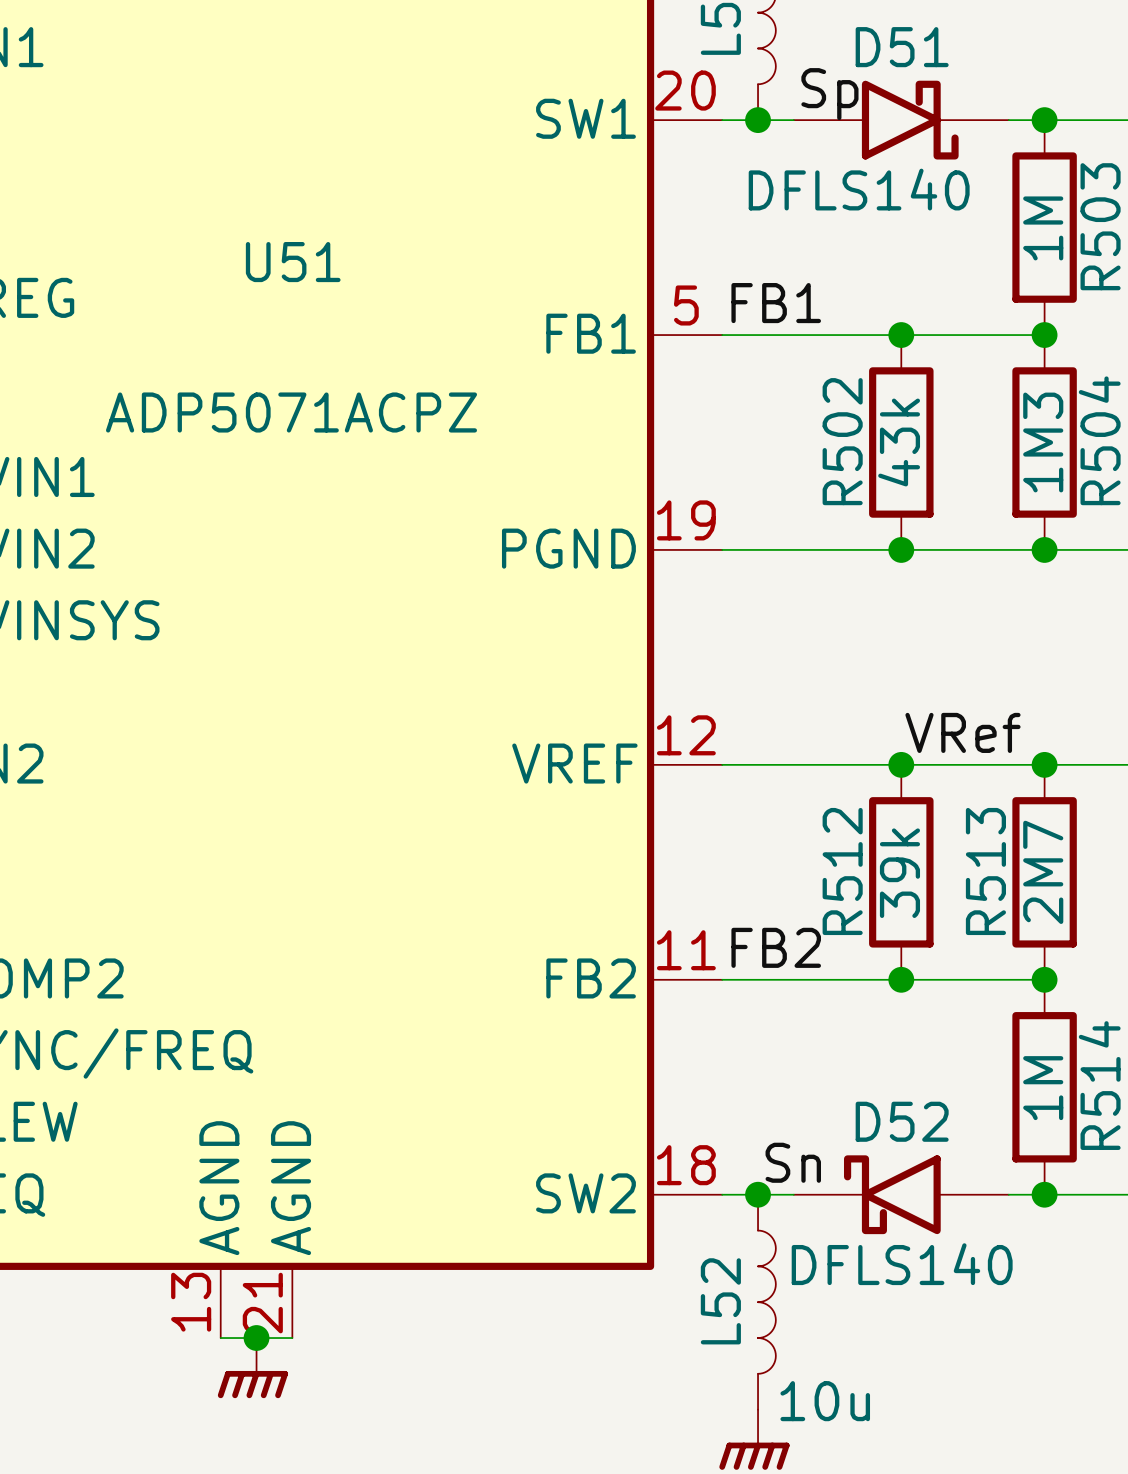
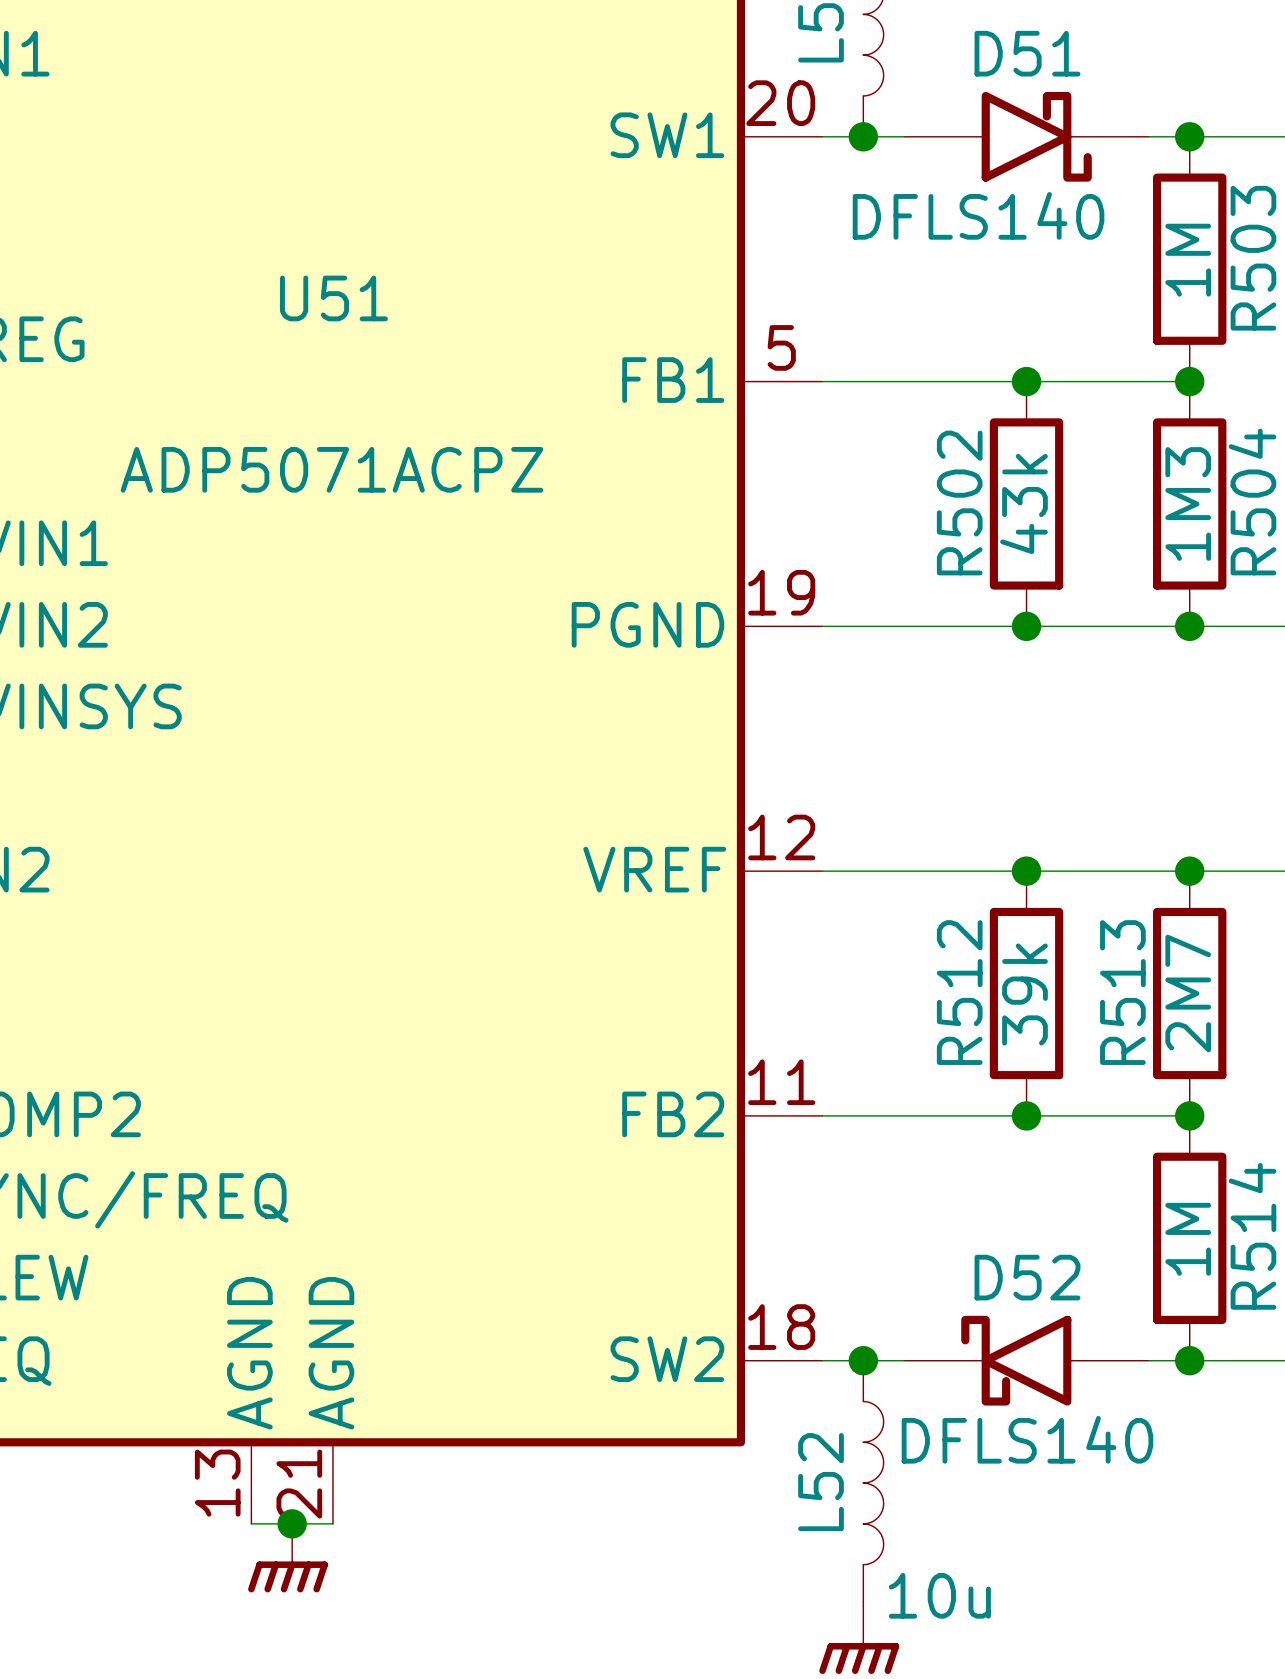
label: Sp (829, 94) -> none
label: FB1 (776, 303) -> none
label: VRef (962, 732) -> none
label: FB2 (776, 947) -> none
label: Sn (793, 1162) -> none

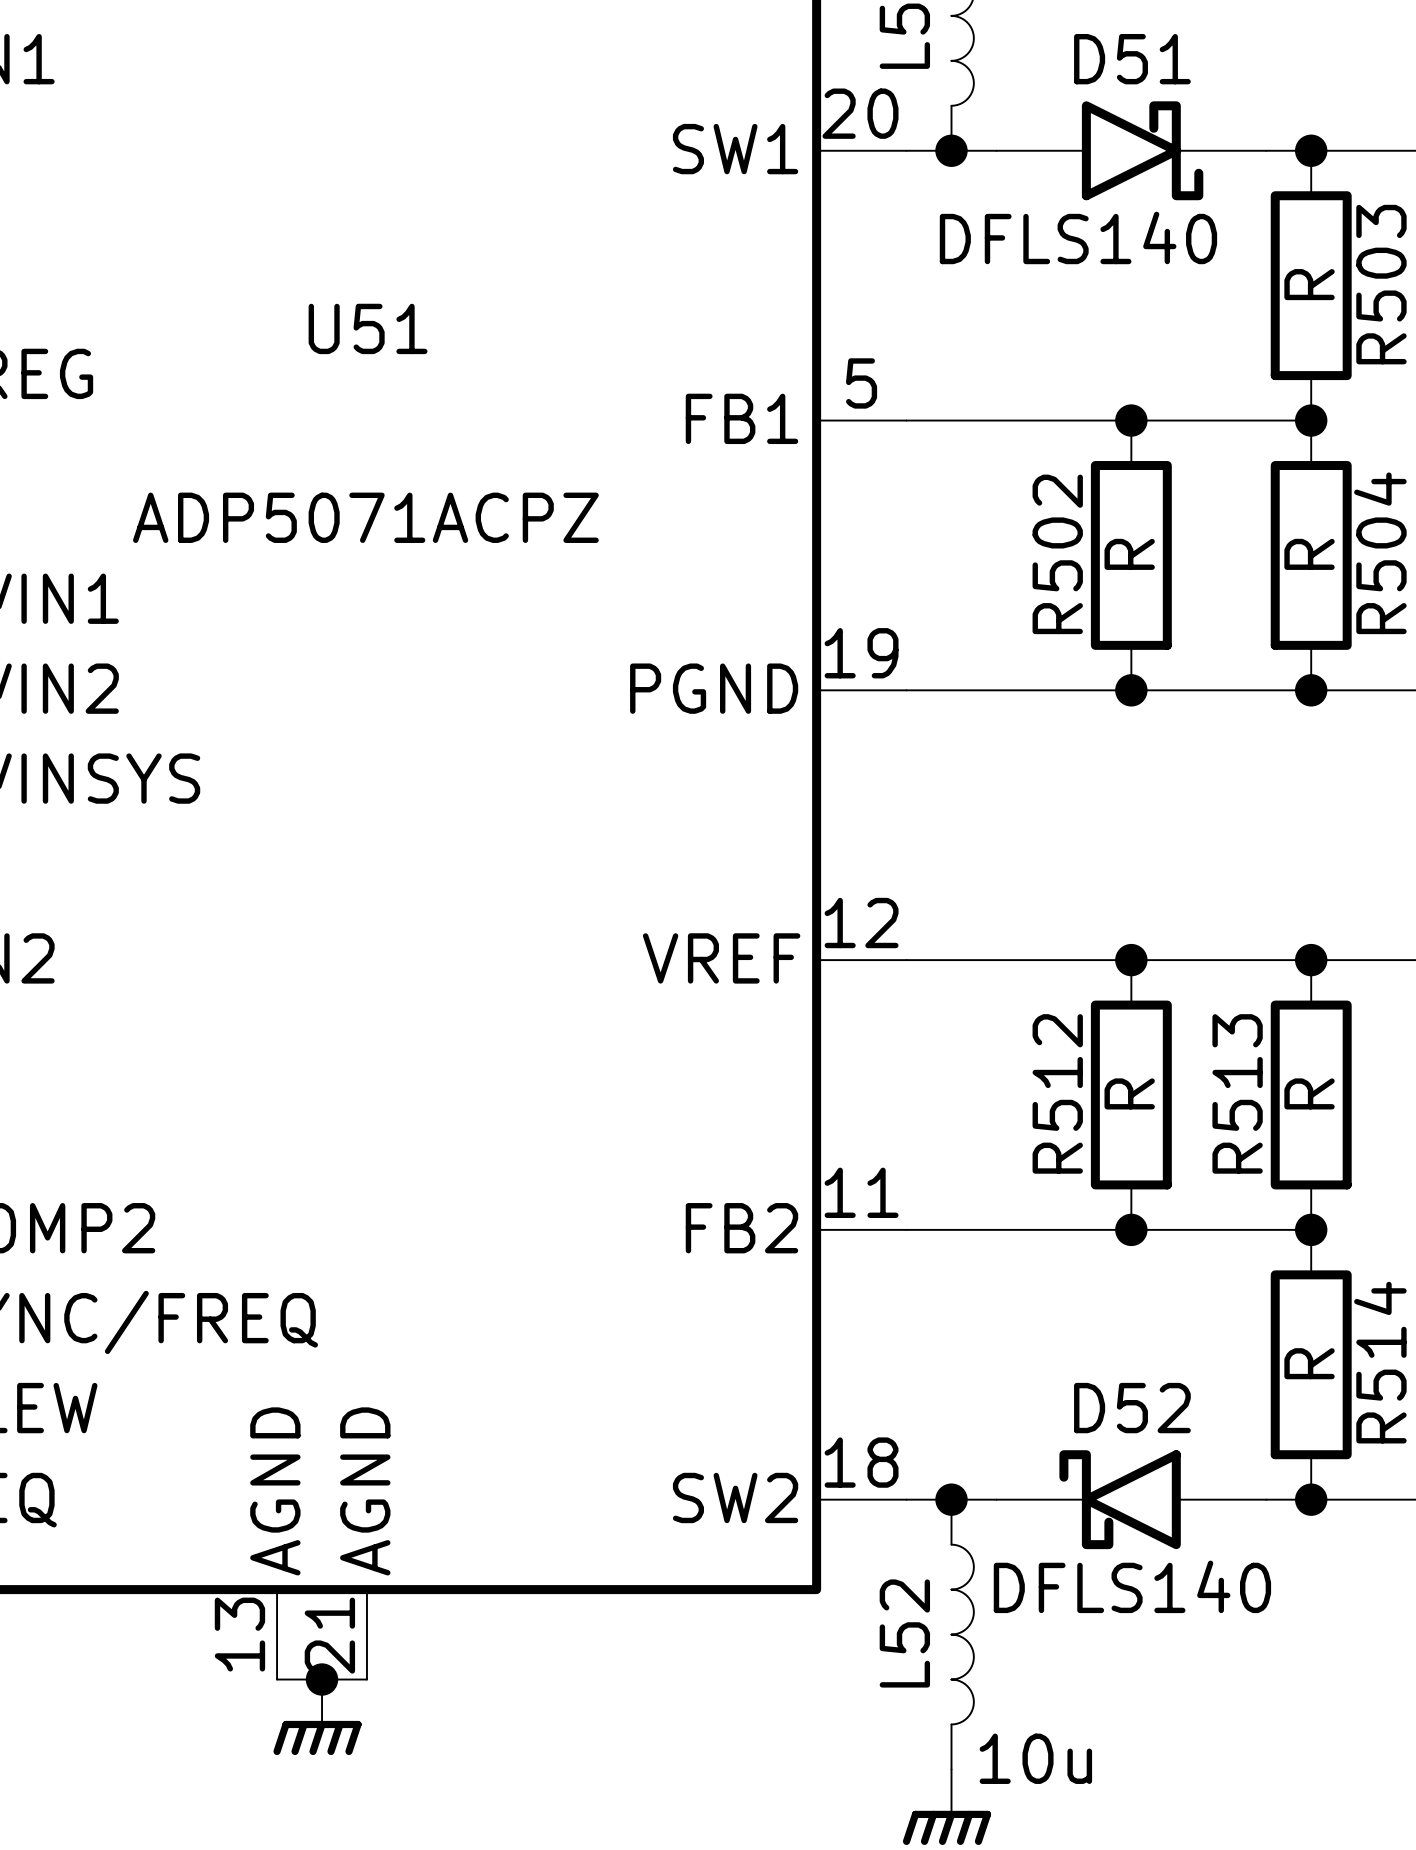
R503 value: 1M (1188, 260) -> R (1309, 284)
R502 value: 43k (1024, 503) -> R (1129, 554)
R504 value: 1M3 (1188, 503) -> R (1309, 554)
R513 value: 2M7 (1188, 993) -> R (1309, 1093)
R512 value: 39k (1024, 994) -> R (1129, 1093)
R514 value: 1M (1188, 1239) -> R (1309, 1363)

